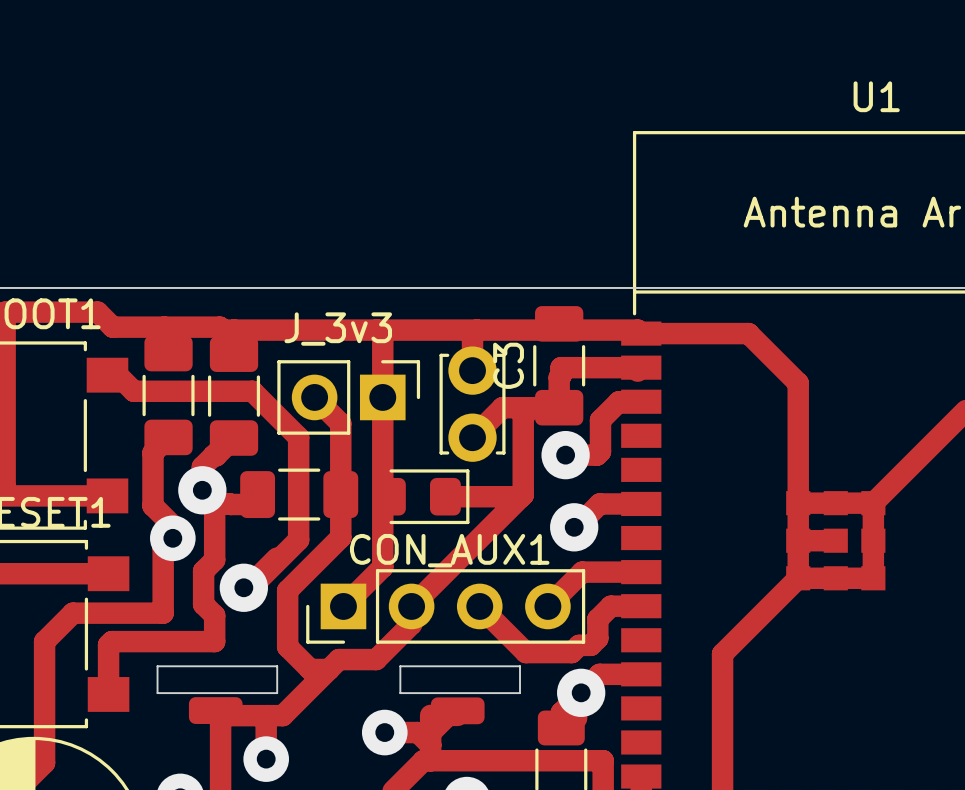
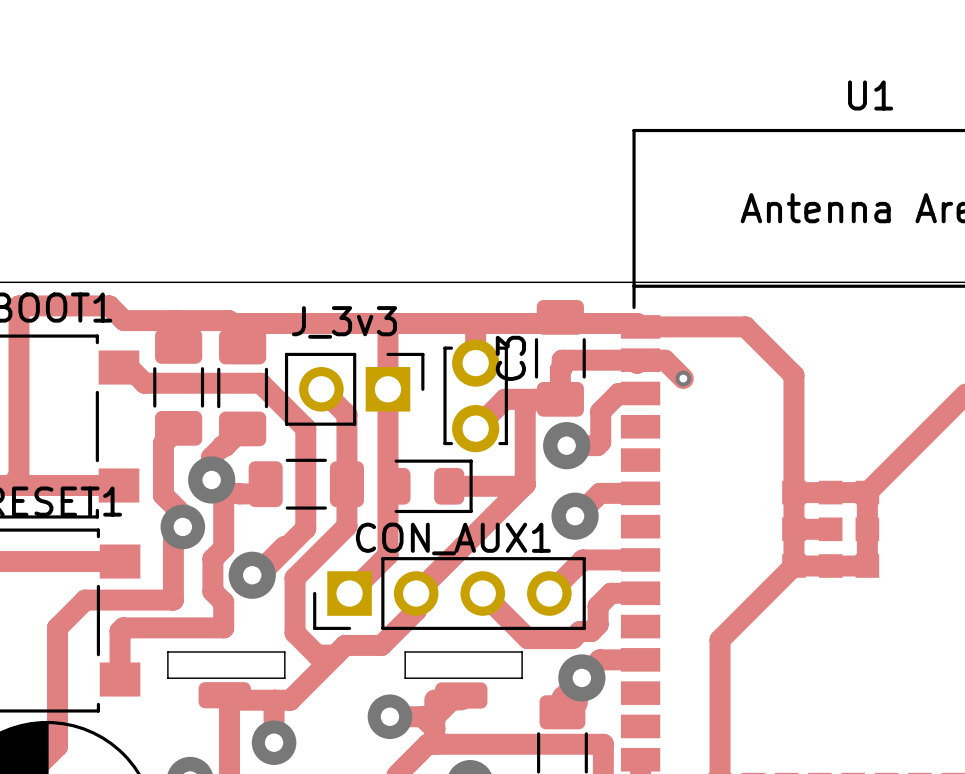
track: none -> (640, 360) (664, 360) (683, 378)
via: none -> (683, 378)

